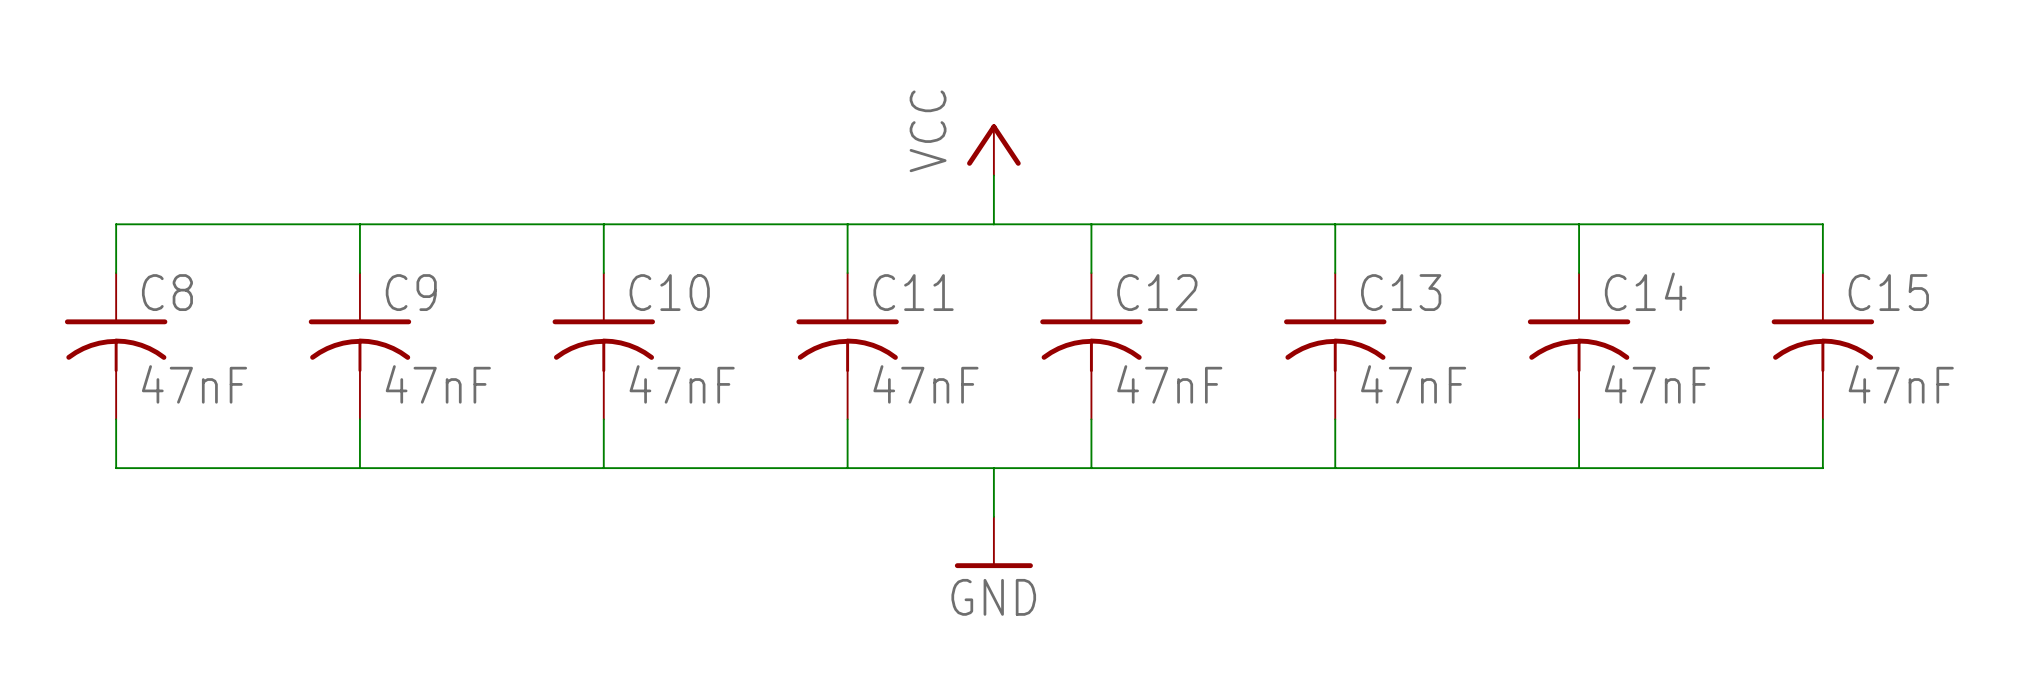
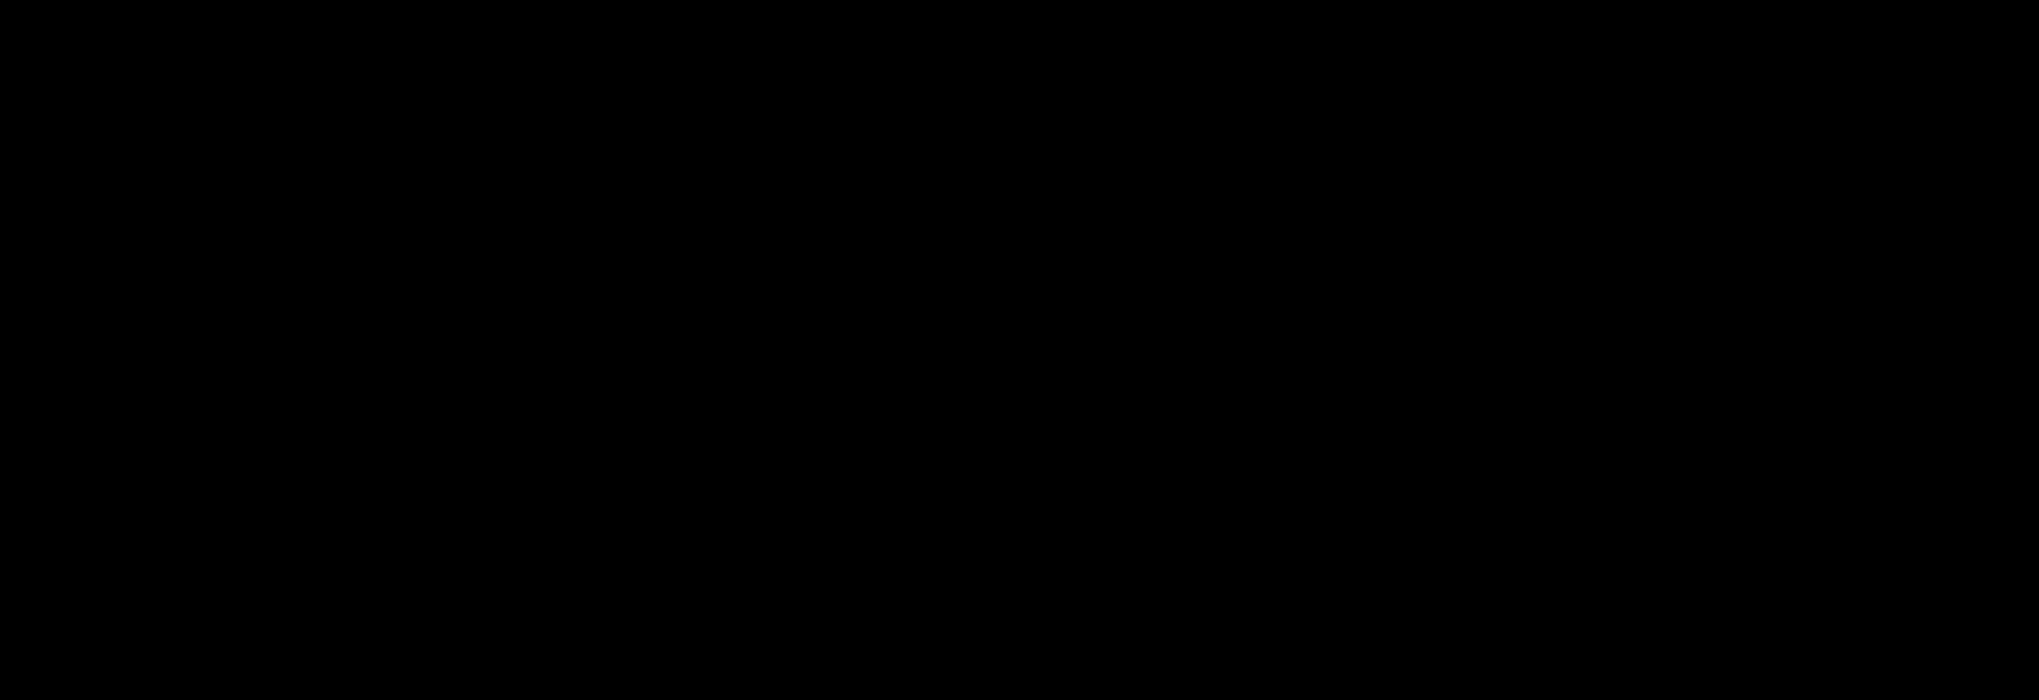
power symbol: VCC (993, 149) -> none
wire: (993, 175) (993, 224) -> none
wire: (359, 224) (359, 273) -> none
wire: (603, 224) (603, 273) -> none
wire: (847, 224) (847, 273) -> none
wire: (1091, 224) (1091, 273) -> none
wire: (1335, 224) (1335, 273) -> none
wire: (1579, 224) (1579, 273) -> none
wire: (116, 273) (116, 224) (1822, 224) (1822, 273) -> none
C8: 47nF (116, 346) -> none
C9: 47nF (359, 346) -> none
C10: 47nF (603, 346) -> none
C11: 47nF (847, 346) -> none
C12: 47nF (1091, 346) -> none
C13: 47nF (1335, 346) -> none
C14: 47nF (1579, 346) -> none
C15: 47nF (1822, 346) -> none
wire: (116, 419) (116, 468) (1822, 468) (1822, 419) -> none
wire: (359, 419) (359, 468) -> none
wire: (603, 419) (603, 468) -> none
wire: (847, 419) (847, 468) -> none
wire: (1091, 419) (1091, 468) -> none
wire: (1335, 419) (1335, 468) -> none
wire: (1579, 419) (1579, 468) -> none
wire: (993, 468) (993, 516) -> none
power symbol: GND (993, 542) -> none

